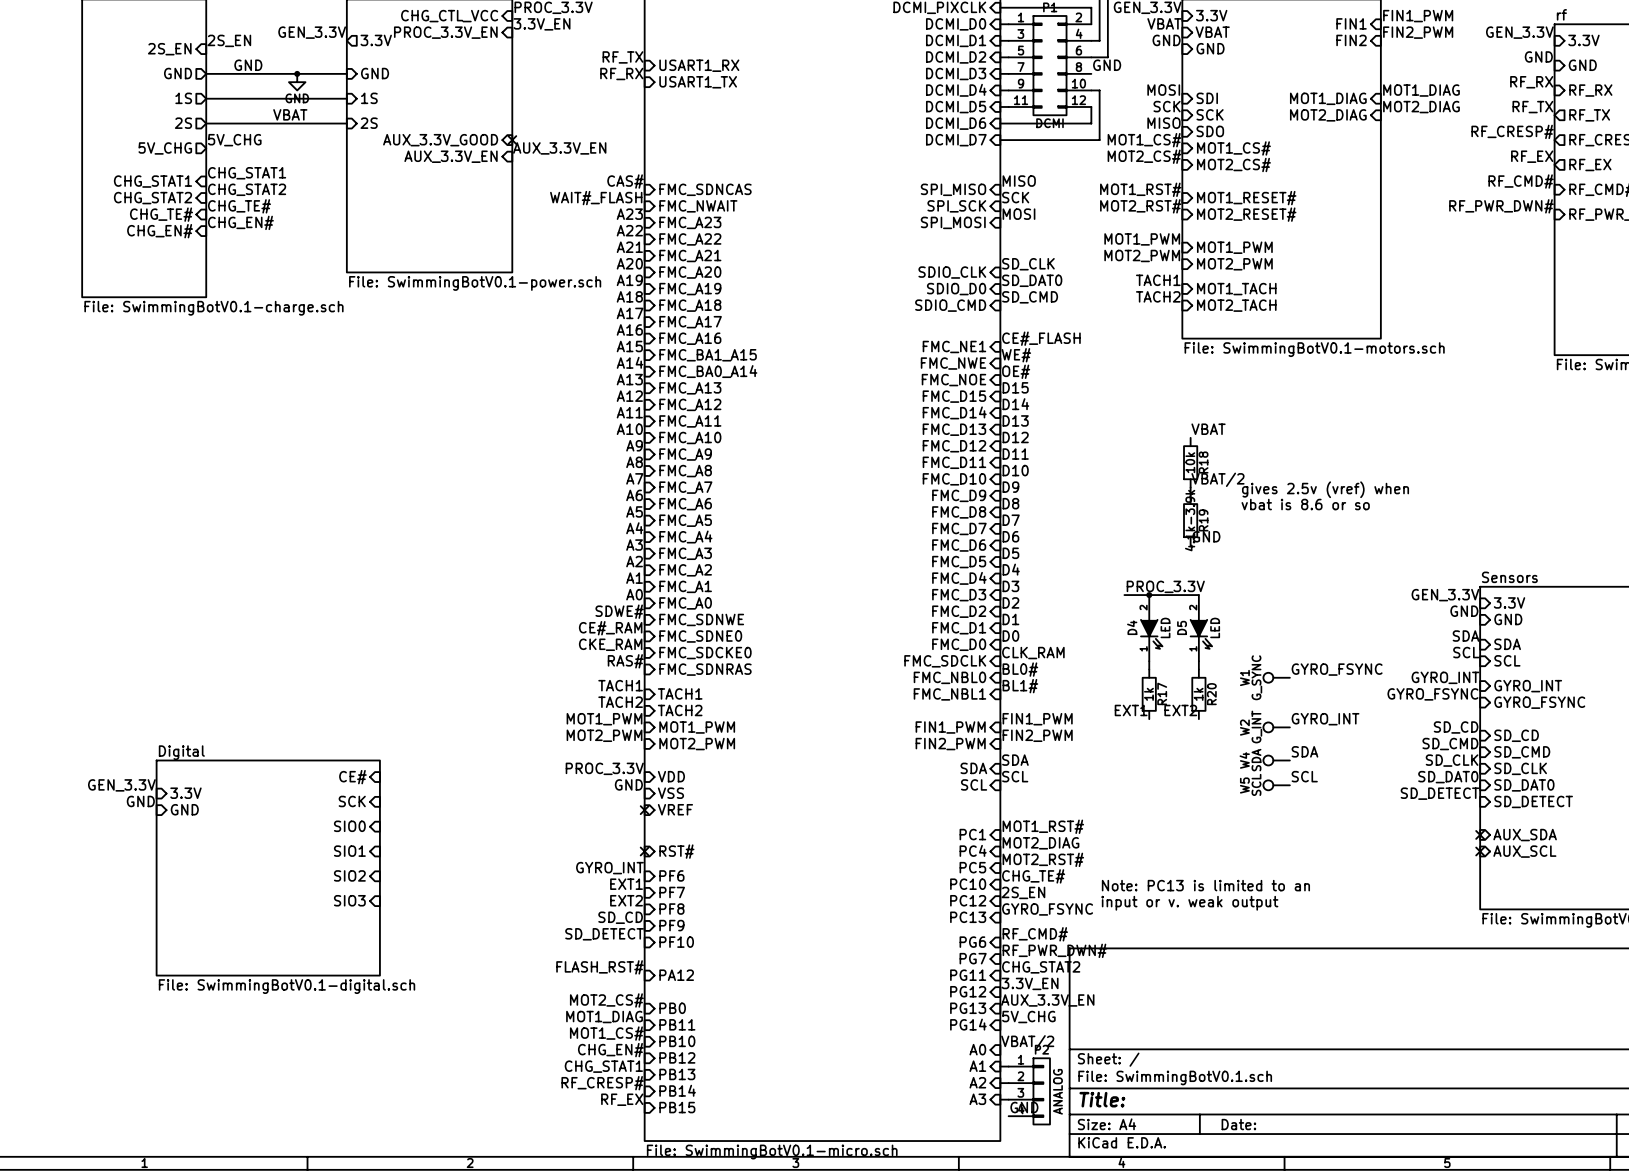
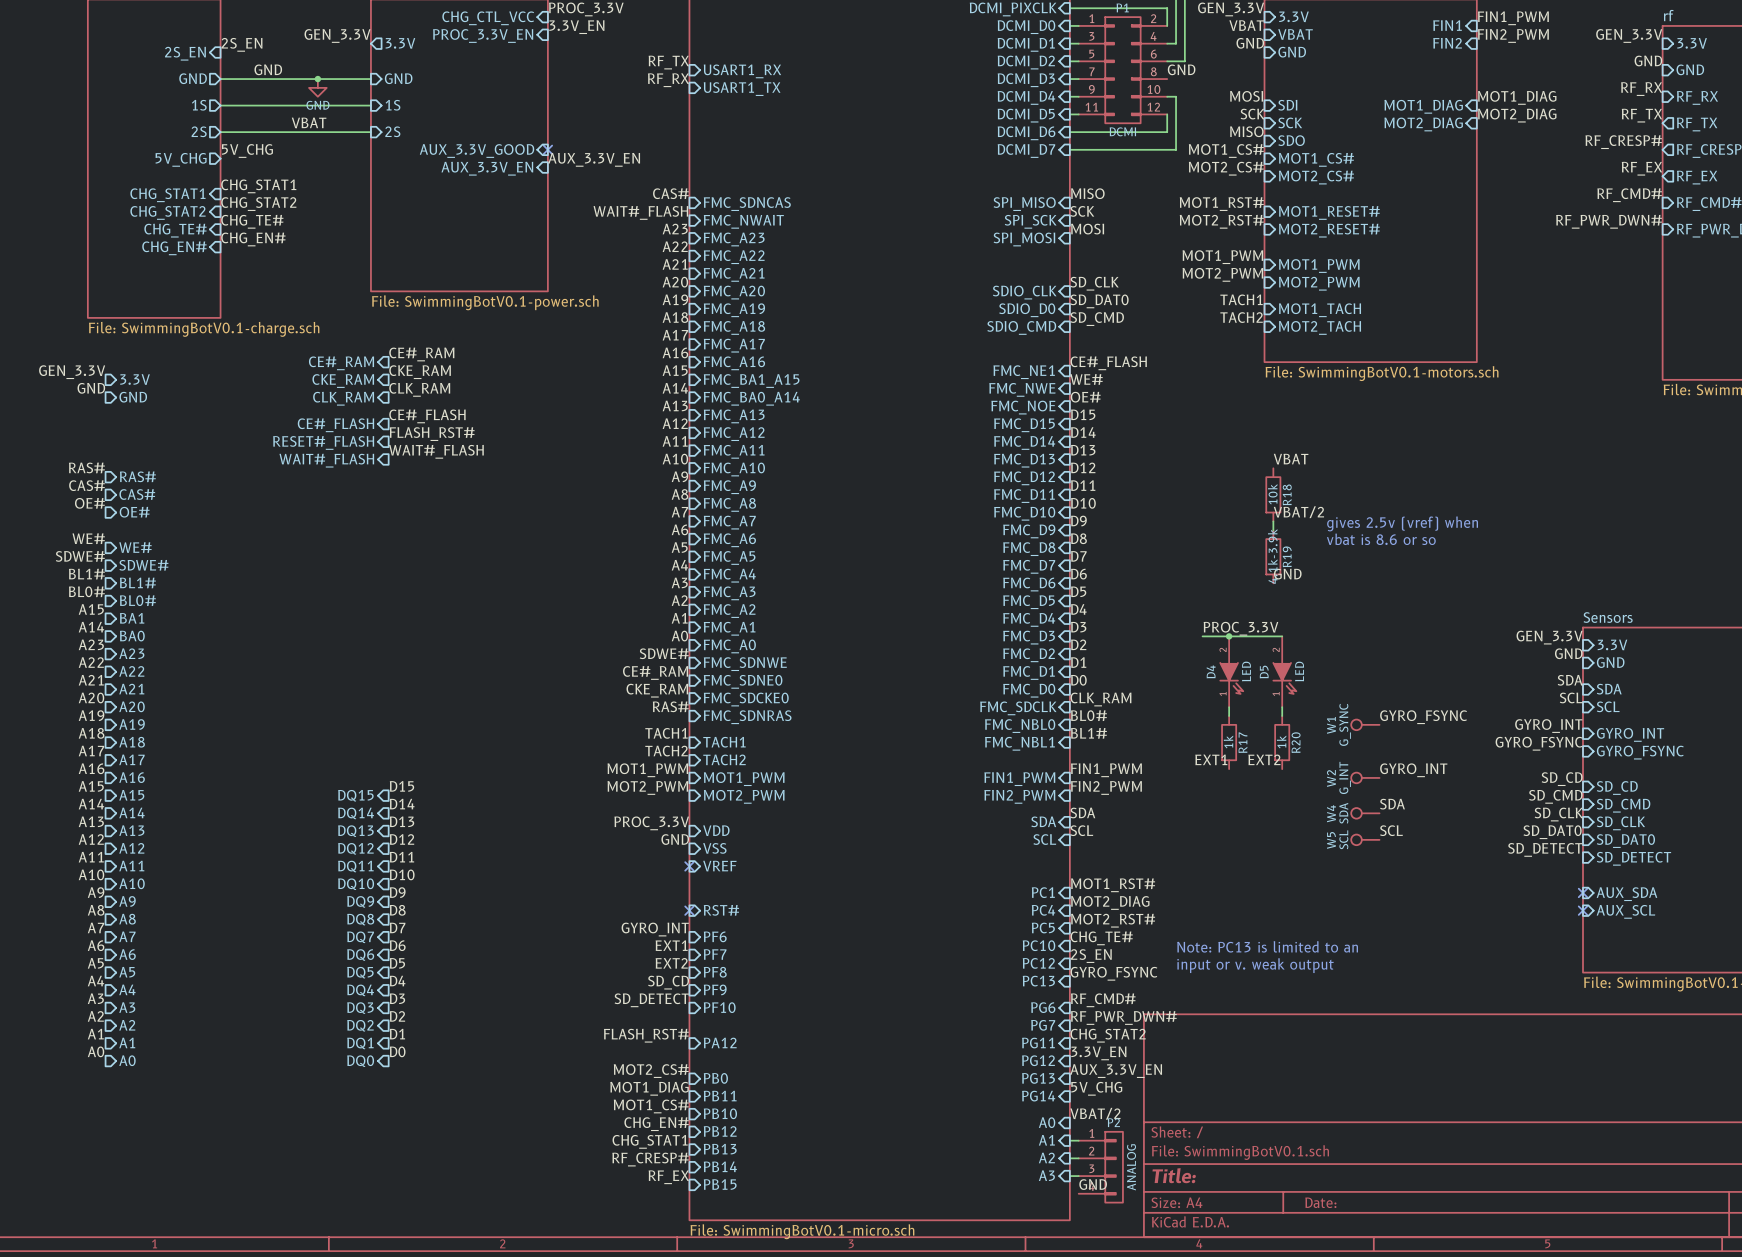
label: none -> CE#_RAM (421, 354)
sheet pin: none -> CE#_RAM (341, 363)
label: none -> GEN_3.3V (72, 372)
label: none -> CKE_RAM (420, 372)
sheet pin: none -> 3.3V (135, 379)
sheet pin: none -> CKE_RAM (343, 381)
label: none -> GND (91, 388)
label: none -> CLK_RAM (419, 389)
sheet pin: none -> GND (133, 397)
sheet pin: none -> CLK_RAM (343, 398)
label: none -> CE#_FLASH (427, 416)
sheet pin: none -> CE#_FLASH (335, 425)
label: none -> FLASH_RST# (432, 434)
sheet pin: none -> RESET#_FLASH (323, 442)
label: none -> WAIT#_FLASH (436, 451)
sheet pin: none -> WAIT#_FLASH (326, 460)
label: none -> RAS# (86, 467)
sheet pin: none -> RAS# (137, 476)
label: none -> CAS# (87, 485)
sheet pin: none -> CAS# (137, 494)
label: none -> OE# (89, 503)
sheet pin: none -> OE# (134, 512)
label: none -> WE# (88, 538)
sheet pin: none -> WE# (135, 547)
label: none -> SDWE# (80, 556)
sheet pin: none -> SDWE# (143, 565)
label: none -> BL1# (86, 574)
sheet pin: none -> BL1# (137, 582)
label: none -> BL0# (86, 591)
sheet pin: none -> BL0# (137, 600)
label: none -> A15 (91, 609)
sheet pin: none -> BA1 (132, 618)
label: none -> A14 (91, 627)
sheet pin: none -> BA0 (132, 636)
label: none -> A23 (91, 644)
sheet pin: none -> A23 (131, 653)
label: none -> A22 (91, 662)
sheet pin: none -> A22 (131, 671)
label: none -> A21 (91, 680)
sheet pin: none -> A21 (131, 689)
label: none -> A20 (91, 697)
sheet pin: none -> A20 (131, 706)
label: none -> A19 (91, 715)
sheet pin: none -> A19 (132, 724)
label: none -> A18 (91, 733)
sheet pin: none -> A18 (132, 742)
label: none -> A17 (91, 750)
sheet pin: none -> A17 (131, 759)
label: none -> A16 (91, 768)
sheet pin: none -> A16 (132, 777)
label: none -> A15 (91, 786)
label: none -> D15 (401, 786)
sheet pin: none -> A15 (131, 795)
sheet pin: none -> DQ15 (355, 795)
label: none -> A14 (91, 804)
label: none -> D14 (402, 804)
sheet pin: none -> A14 (131, 812)
sheet pin: none -> DQ14 (356, 813)
label: none -> A13 (91, 821)
label: none -> D13 (402, 821)
sheet pin: none -> A13 (131, 830)
sheet pin: none -> DQ13 (355, 831)
sheet pin: CE# (352, 777) -> none
label: none -> A12 (91, 839)
label: none -> D12 (402, 839)
label: GEN_3.3V (121, 785) -> none
sheet pin: none -> A12 (131, 848)
sheet pin: 3.3V (185, 793) -> none
sheet pin: none -> DQ12 (355, 848)
label: none -> A11 (91, 857)
label: GND (140, 801) -> none
sheet pin: SCK (352, 801) -> none
label: none -> D11 (401, 857)
sheet pin: none -> A11 (131, 866)
sheet pin: GND (184, 809) -> none
sheet pin: none -> DQ11 (355, 866)
label: none -> A10 (91, 874)
label: none -> D10 (402, 874)
sheet pin: none -> A10 (131, 883)
sheet pin: none -> DQ10 (356, 884)
sheet pin: SIO0 (349, 826) -> none
label: none -> A9 (96, 892)
label: none -> D9 (397, 892)
sheet pin: none -> A9 (127, 901)
sheet pin: none -> DQ9 (360, 901)
label: none -> A8 (96, 910)
sheet pin: SIO1 (349, 851) -> none
label: none -> D8 (397, 910)
sheet pin: none -> A8 (127, 919)
sheet pin: none -> DQ8 (360, 919)
label: none -> A7 (95, 927)
label: none -> D7 (397, 927)
sheet Digital: File: SwimmingBotV0.1-digital.sch (268, 868) -> none
sheet pin: none -> A7 (127, 936)
sheet pin: SIO2 (349, 875) -> none
sheet pin: none -> DQ7 (360, 937)
label: none -> A6 (96, 945)
label: none -> D6 (397, 945)
sheet pin: none -> A6 (127, 954)
sheet pin: none -> DQ6 (360, 955)
label: none -> A5 (95, 963)
sheet pin: SIO3 (349, 900) -> none
label: none -> D5 (397, 963)
sheet pin: none -> A5 (127, 972)
sheet pin: none -> DQ5 (360, 972)
label: none -> A4 (95, 981)
label: none -> D4 (397, 981)
sheet pin: none -> A4 (127, 989)
sheet pin: none -> DQ4 (360, 990)
label: none -> A3 (95, 998)
label: none -> D3 (397, 998)
sheet pin: none -> A3 (127, 1007)
sheet pin: none -> DQ3 (360, 1008)
label: none -> A2 (95, 1016)
label: none -> D2 (397, 1016)
sheet pin: none -> A2 (127, 1025)
sheet pin: none -> DQ2 (360, 1025)
label: none -> A1 (95, 1034)
label: none -> D1 (397, 1034)
sheet pin: none -> A1 (127, 1042)
sheet pin: none -> DQ1 (360, 1043)
label: none -> A0 (96, 1051)
label: none -> D0 (397, 1051)
sheet pin: none -> A0 (127, 1060)
sheet pin: none -> DQ0 (360, 1061)

